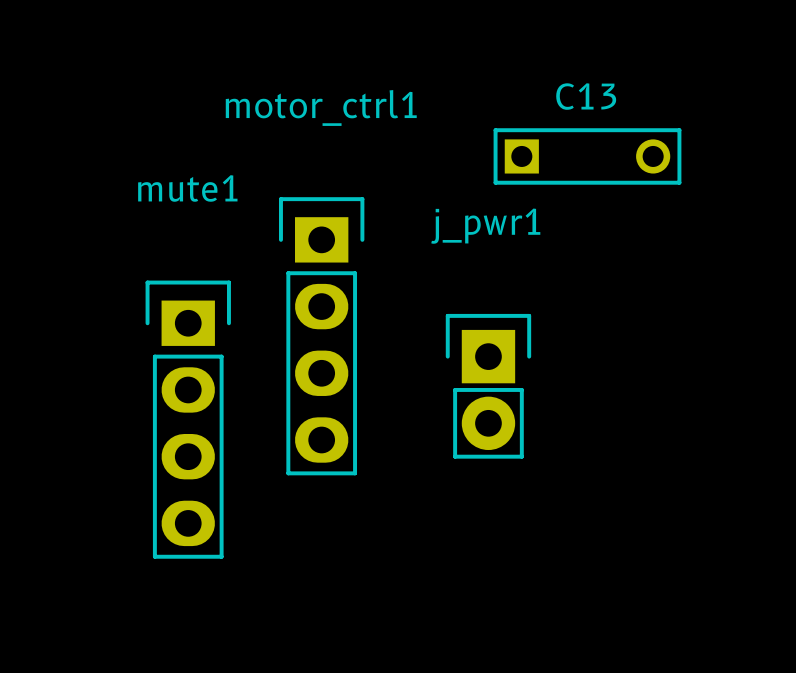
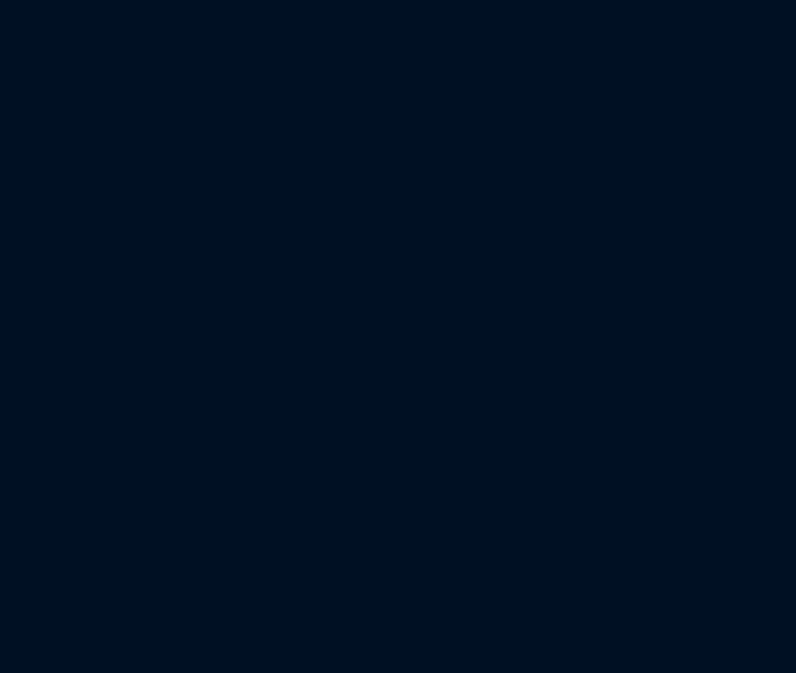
C13: (587, 156) -> none
motor_ctrl1: (321, 336) -> none
j_pwr1: (488, 386) -> none
mute1: (188, 419) -> none

